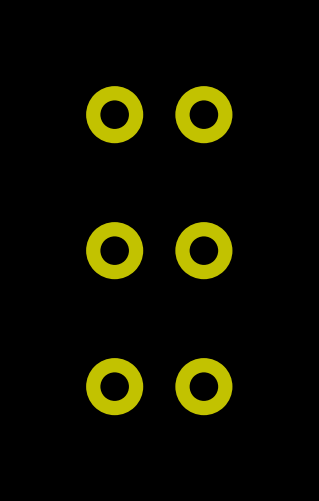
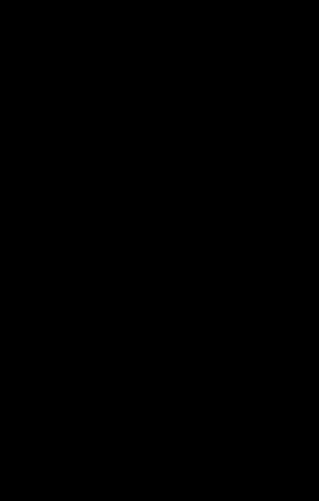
part: (159, 114) -> none
part: (159, 250) -> none
part: (159, 386) -> none

